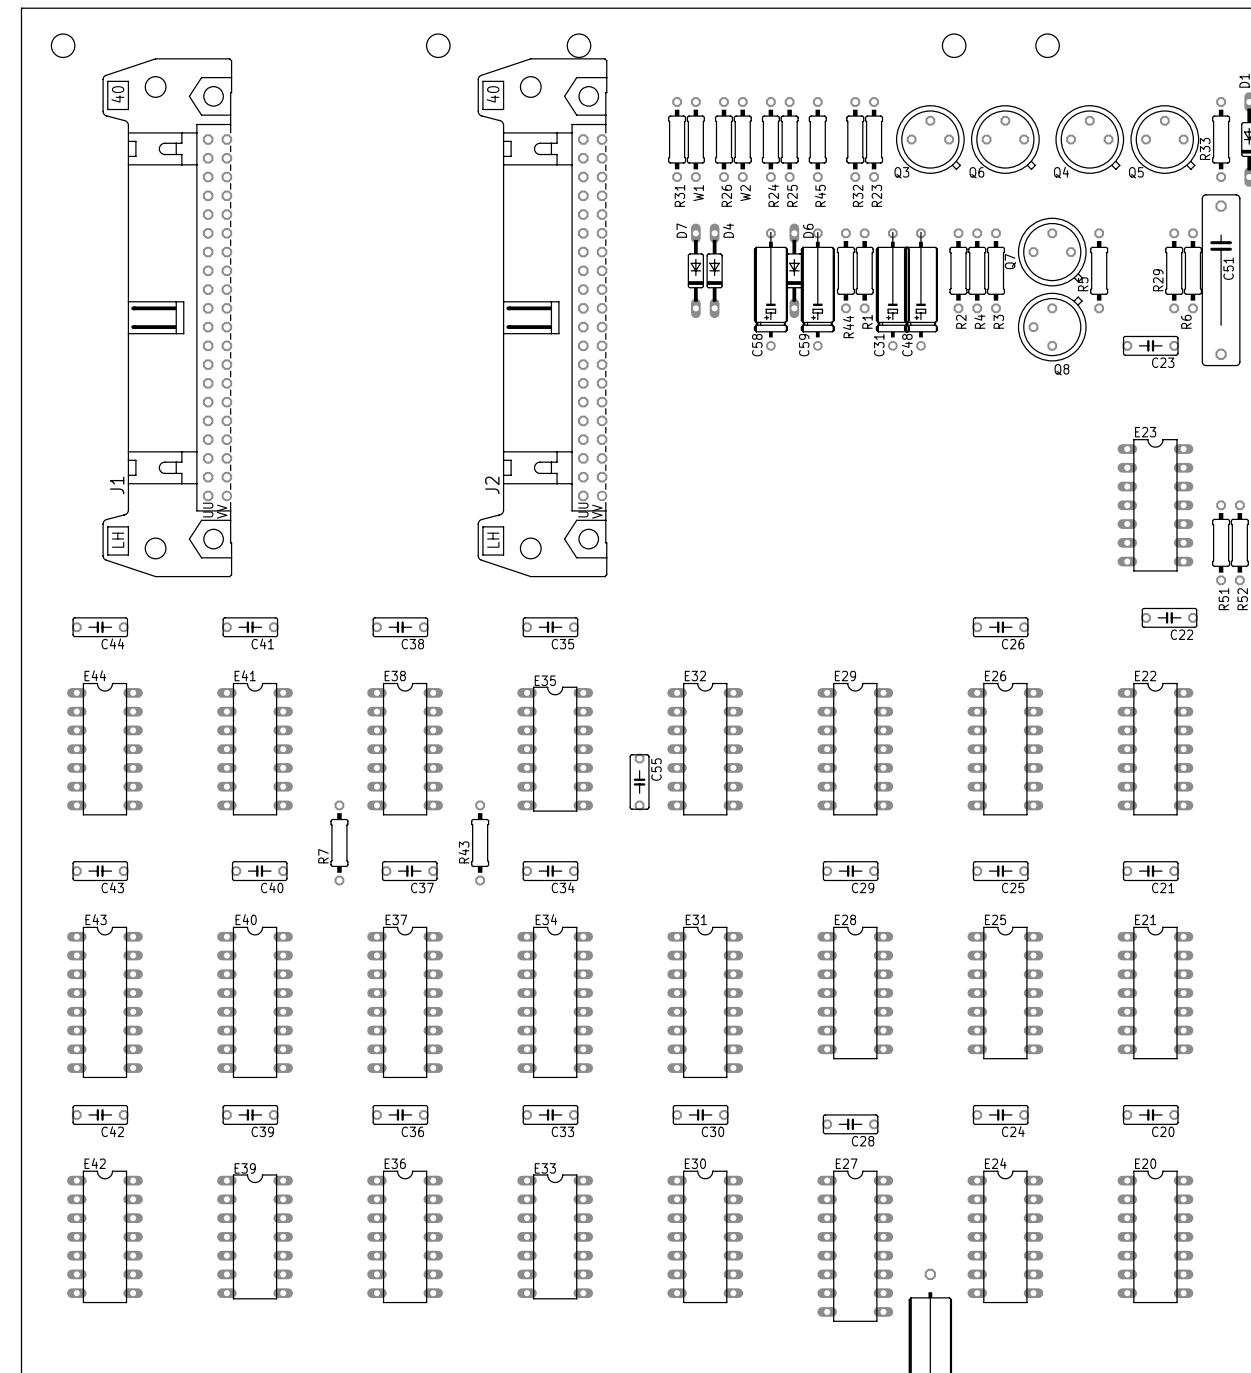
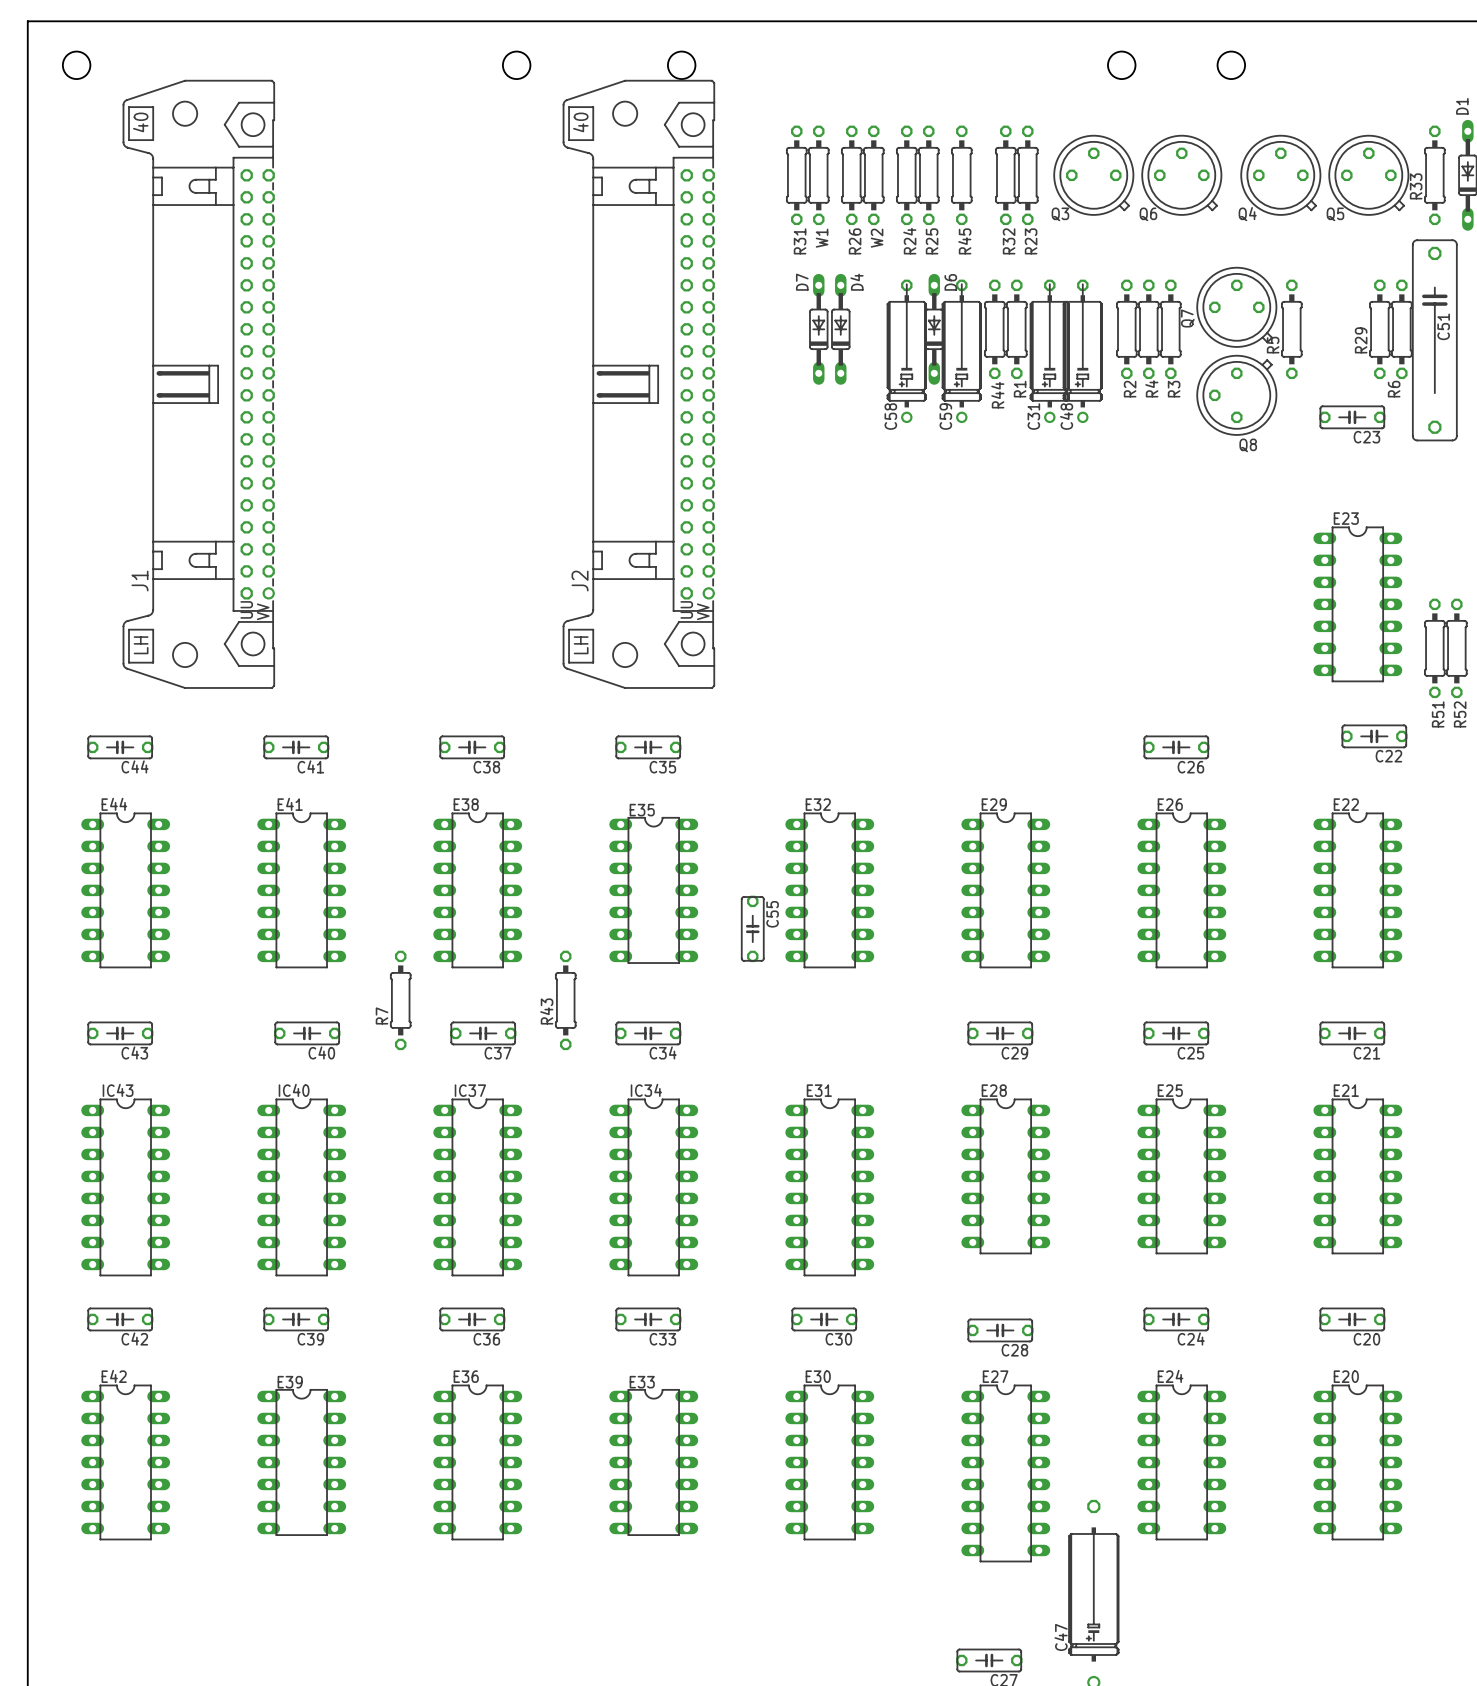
E43 name: E43 (96, 919) -> IC43 (118, 1090)
E40 name: E40 (246, 919) -> IC40 (294, 1090)
E37 name: E37 (396, 919) -> IC37 (470, 1090)
E34 name: E34 (546, 919) -> IC34 (646, 1090)

